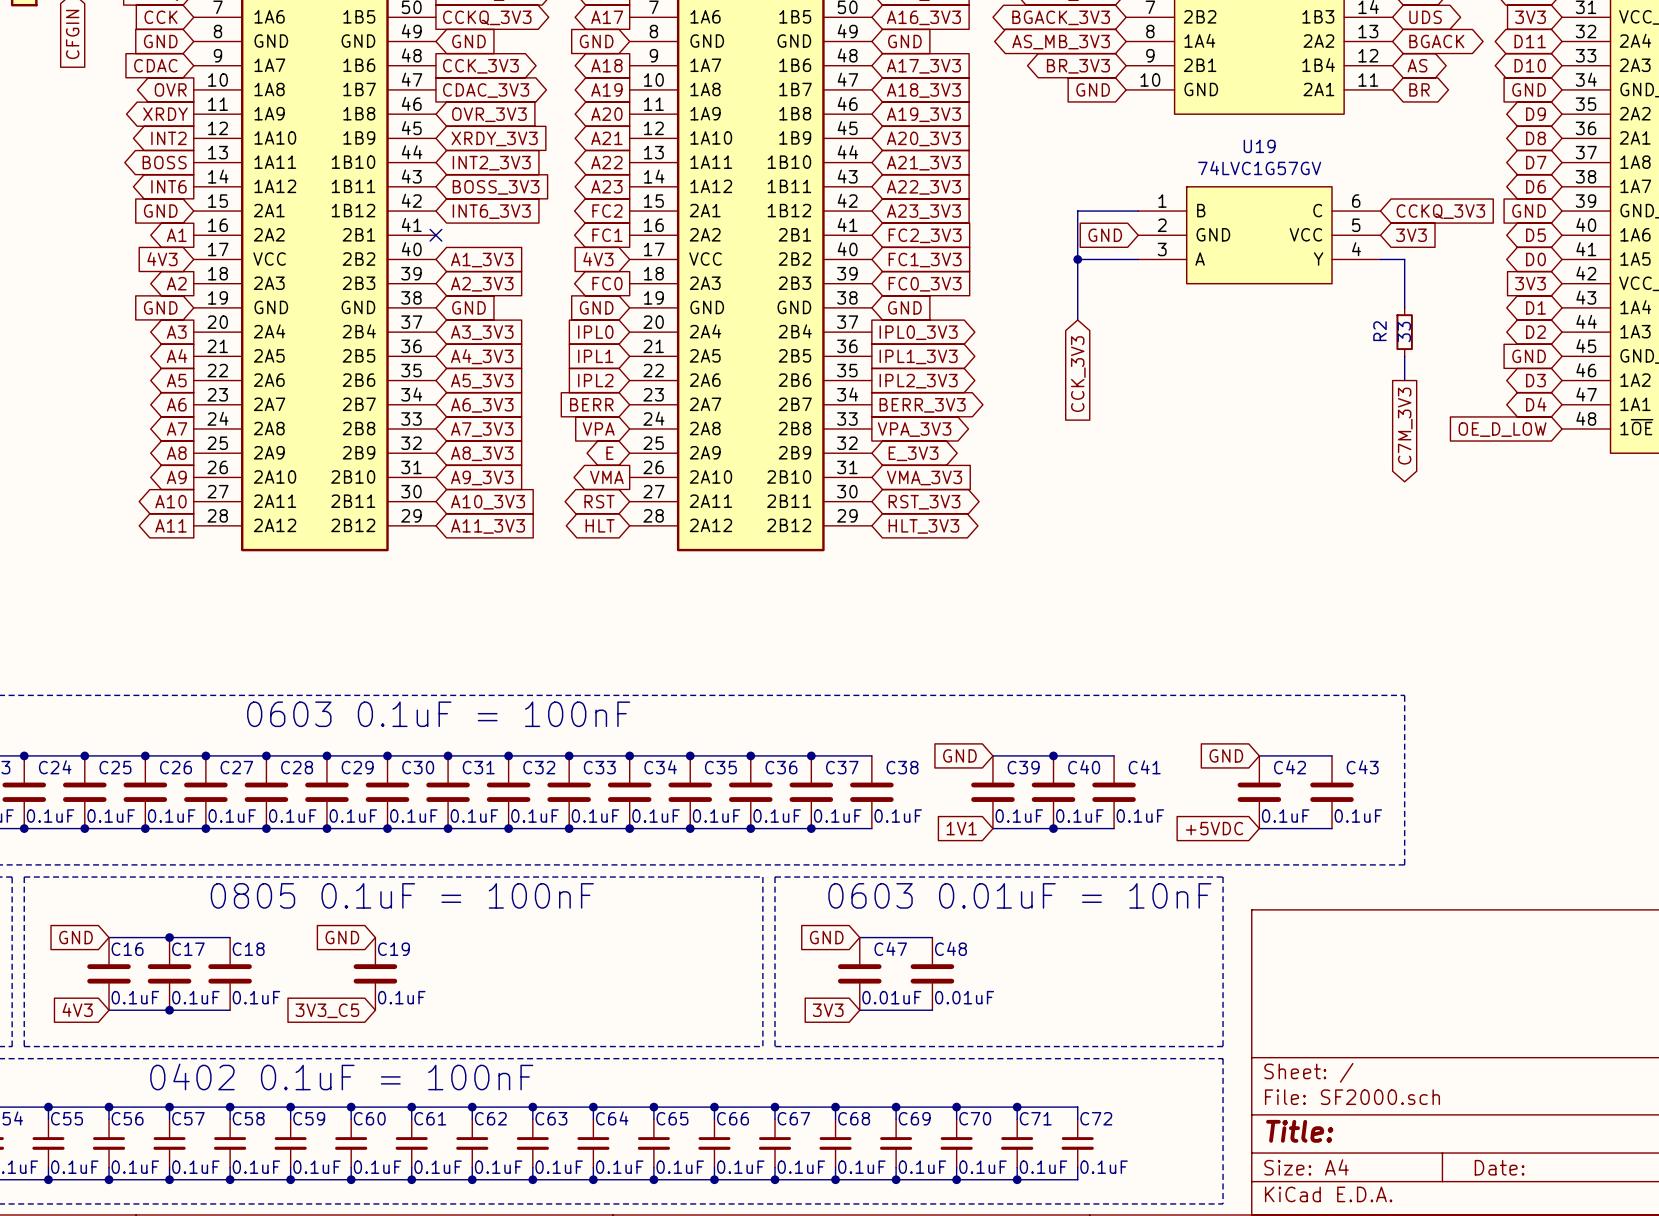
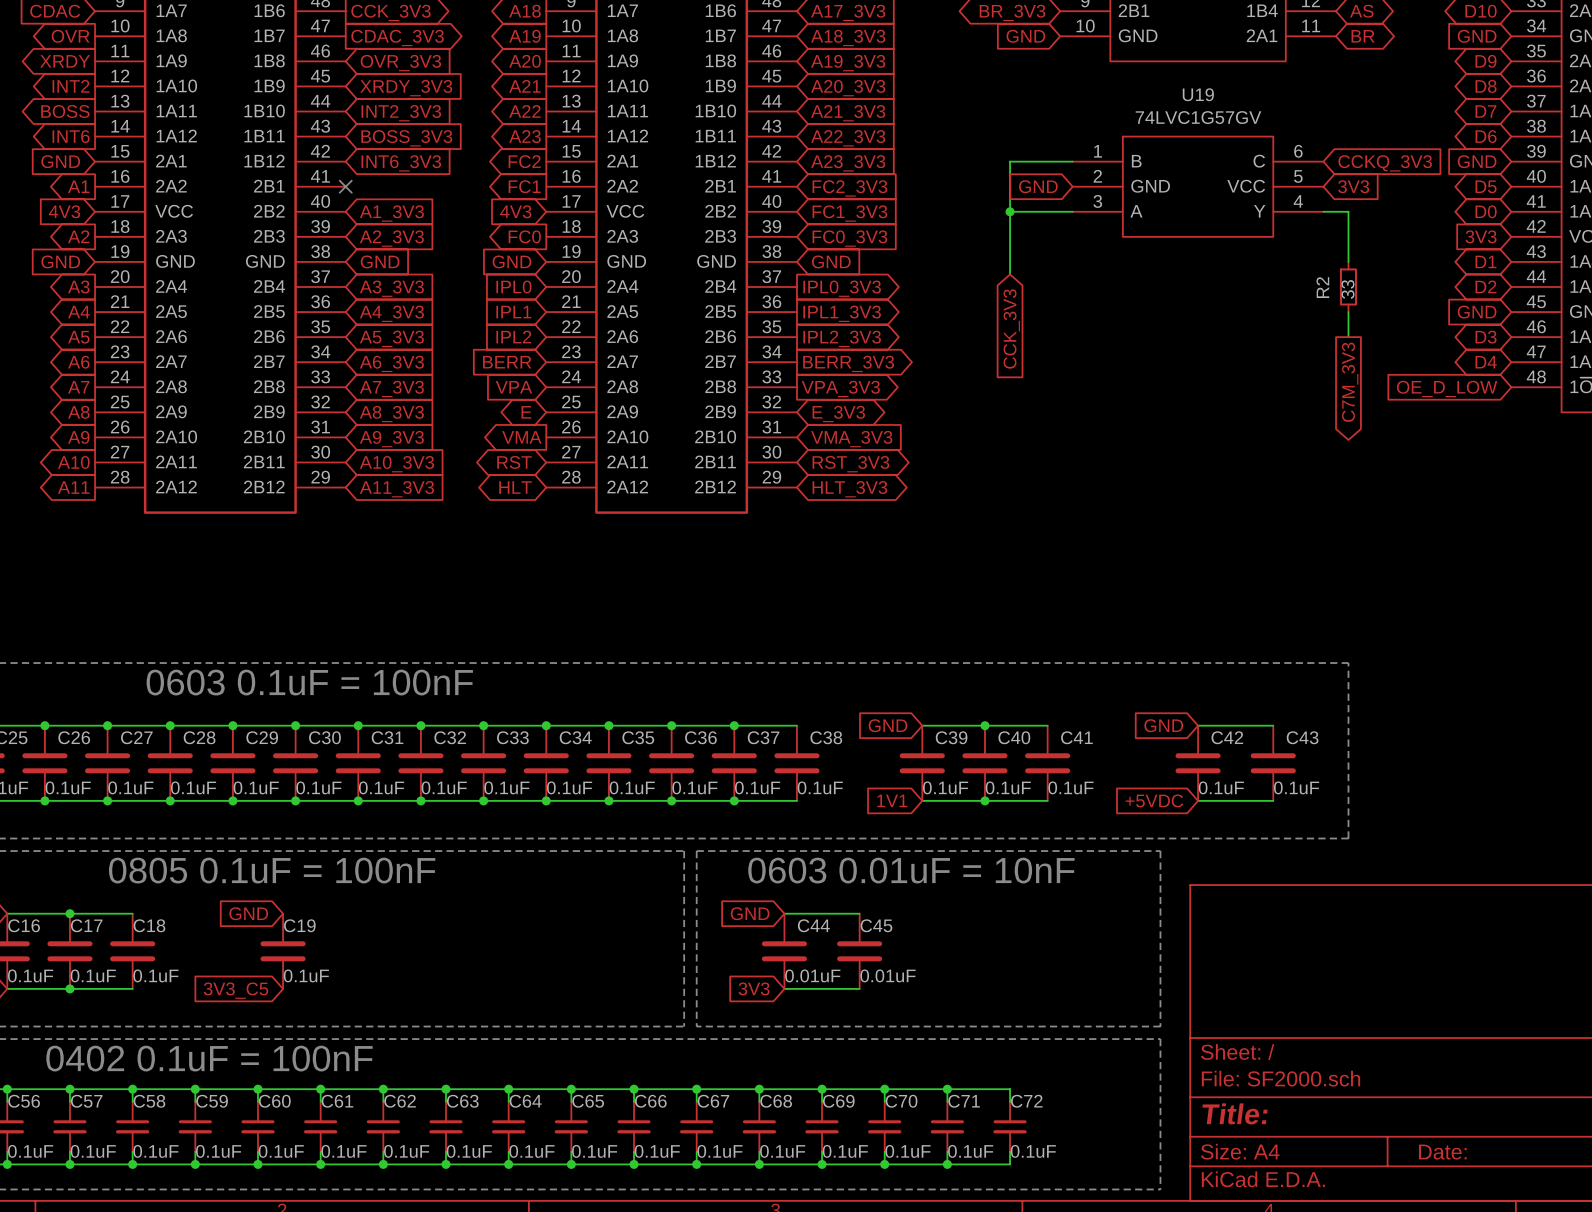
C47 name: C47 (890, 948) -> C44 (813, 925)
C48 name: C48 (950, 948) -> C45 (876, 925)

